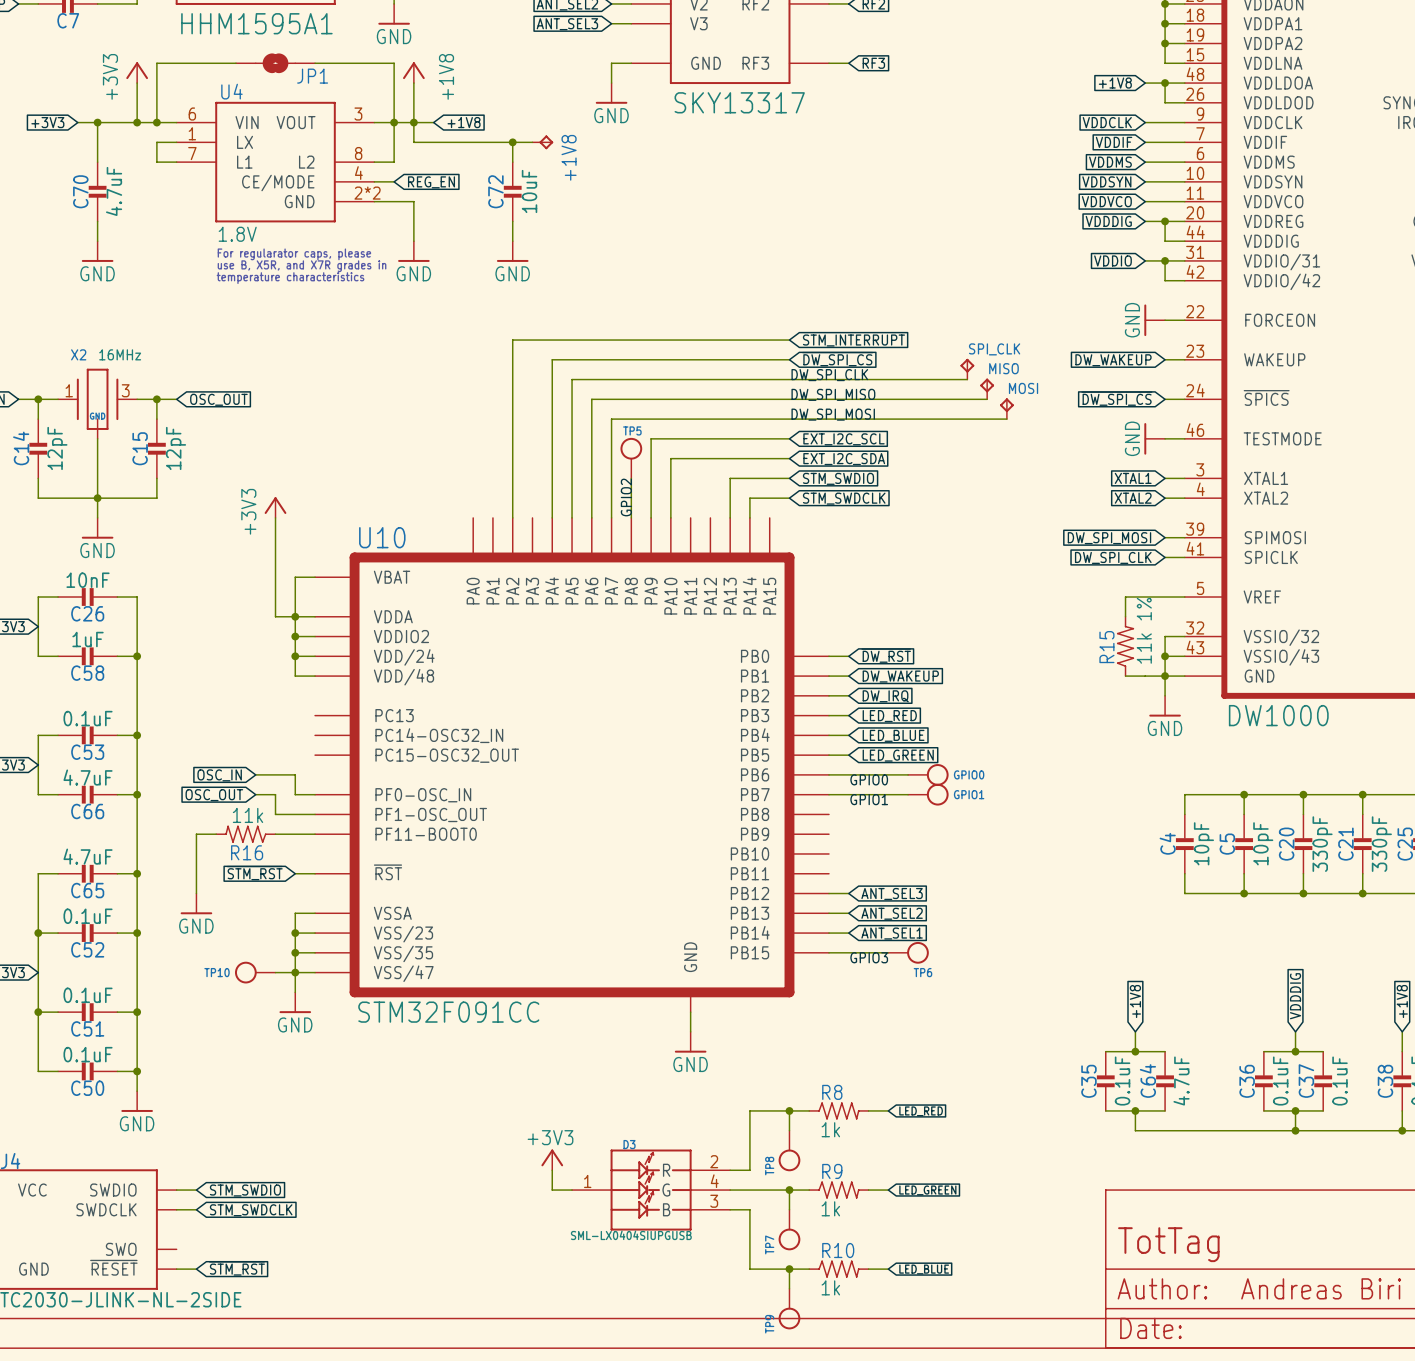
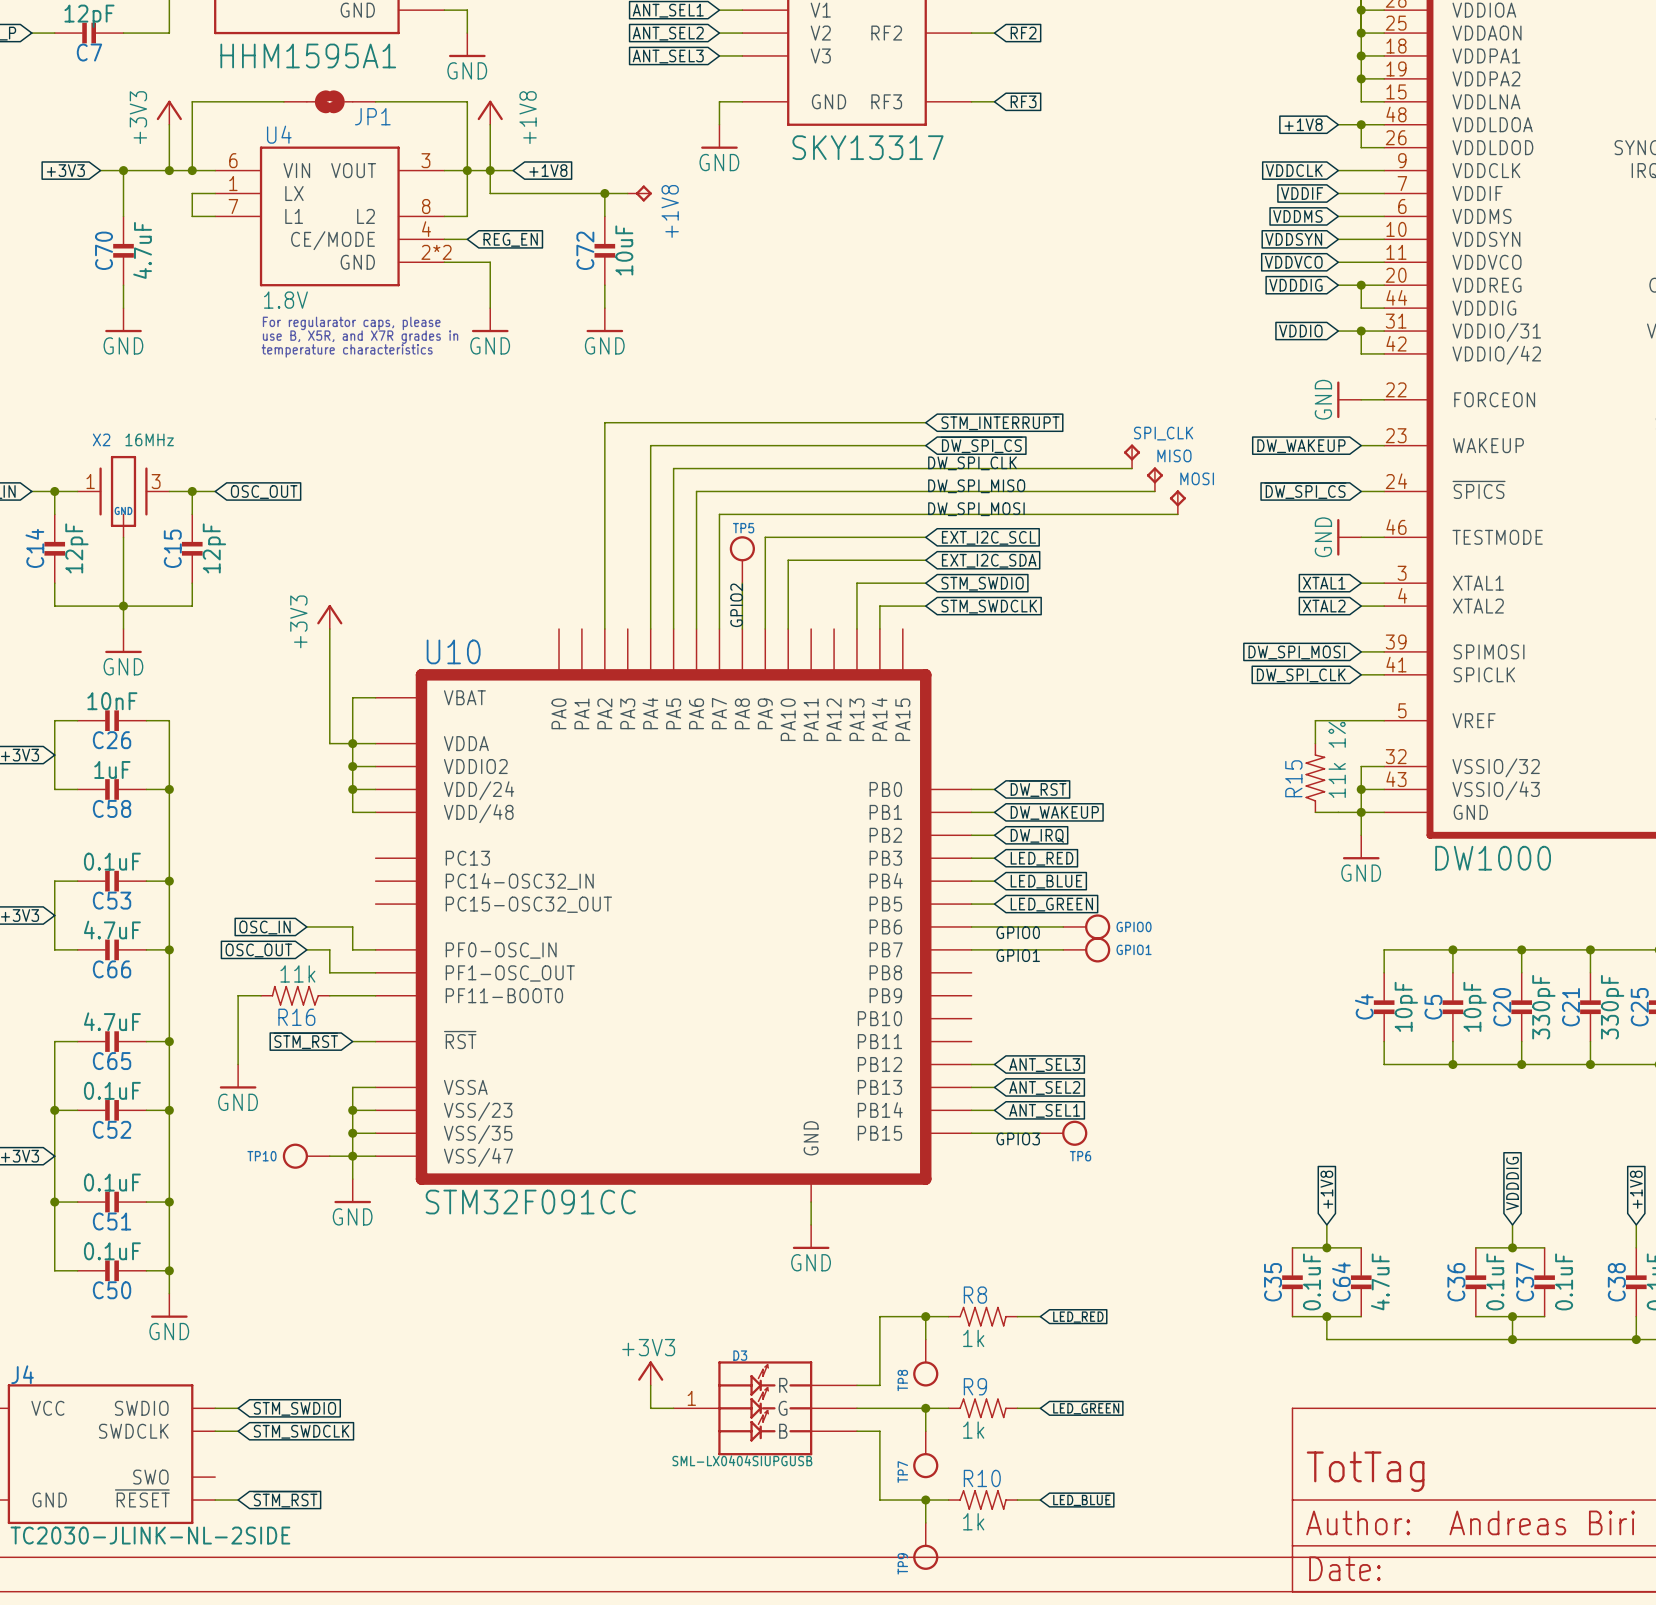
D3 pin number: 2 (714, 1161) -> none
D3 pin number: 4 (714, 1181) -> none
D3 pin number: 3 (714, 1201) -> none

